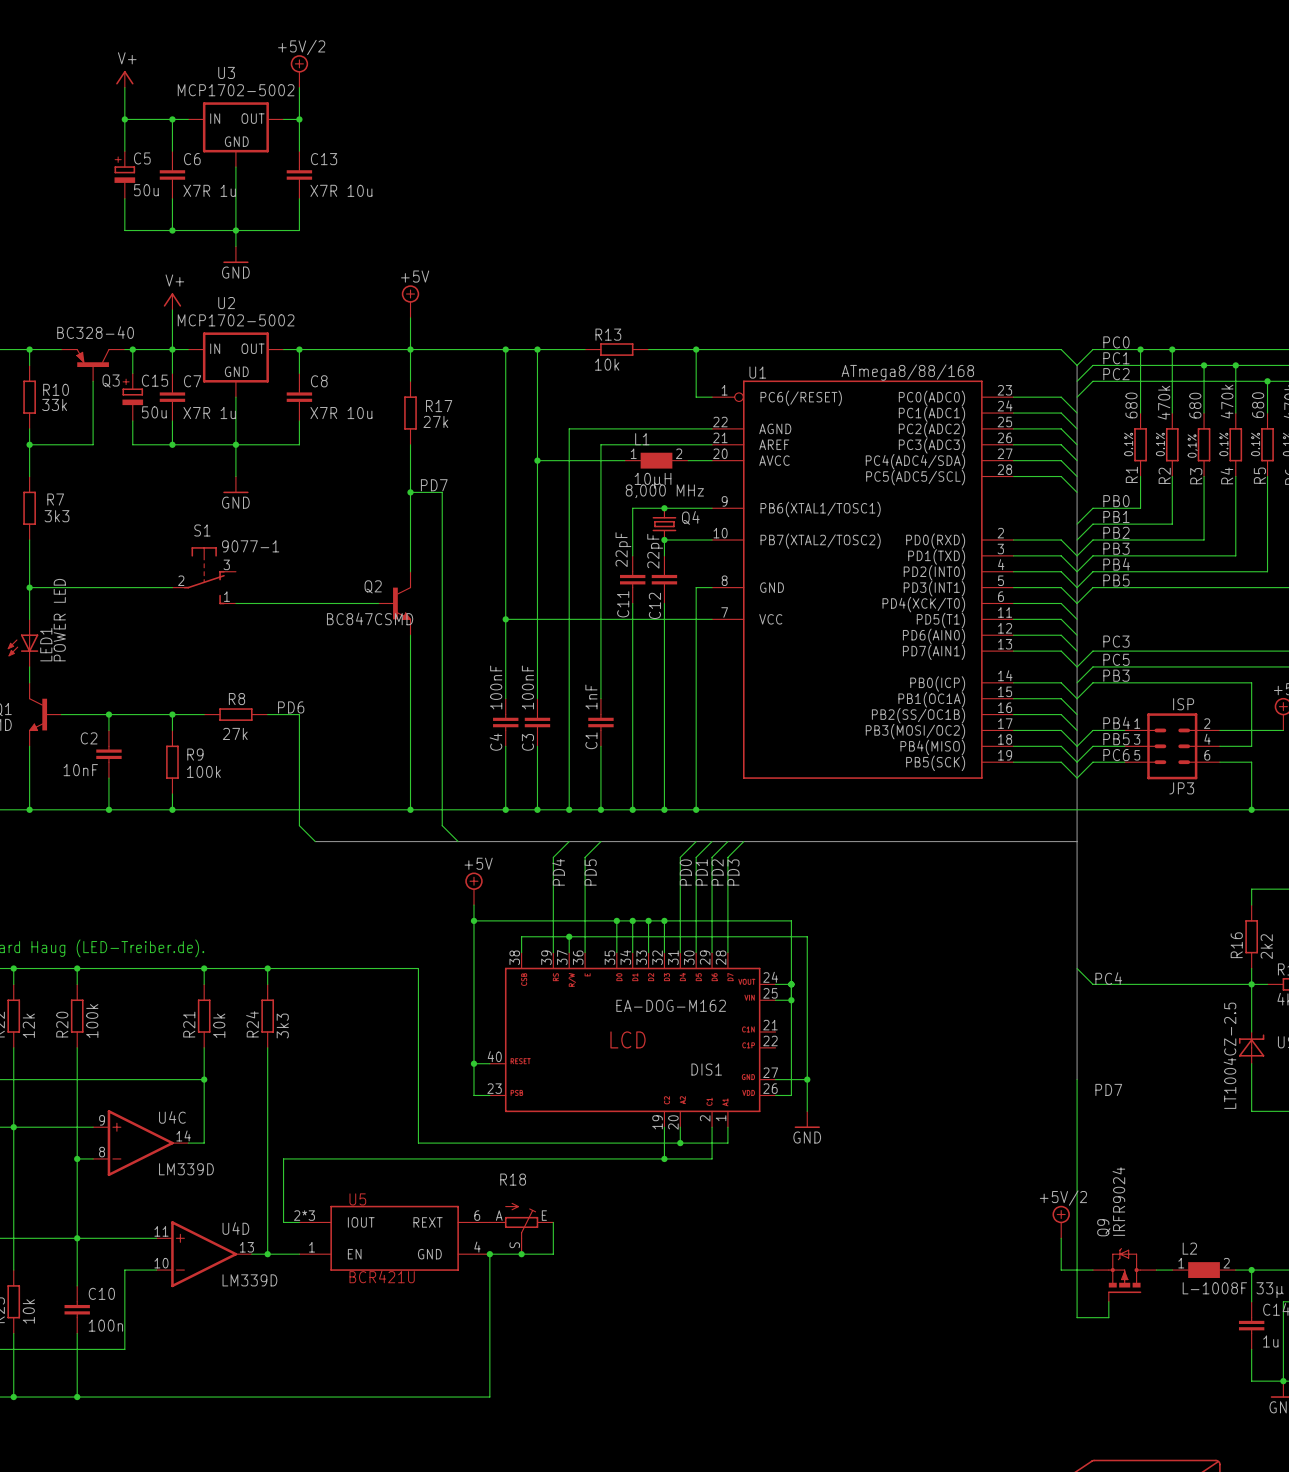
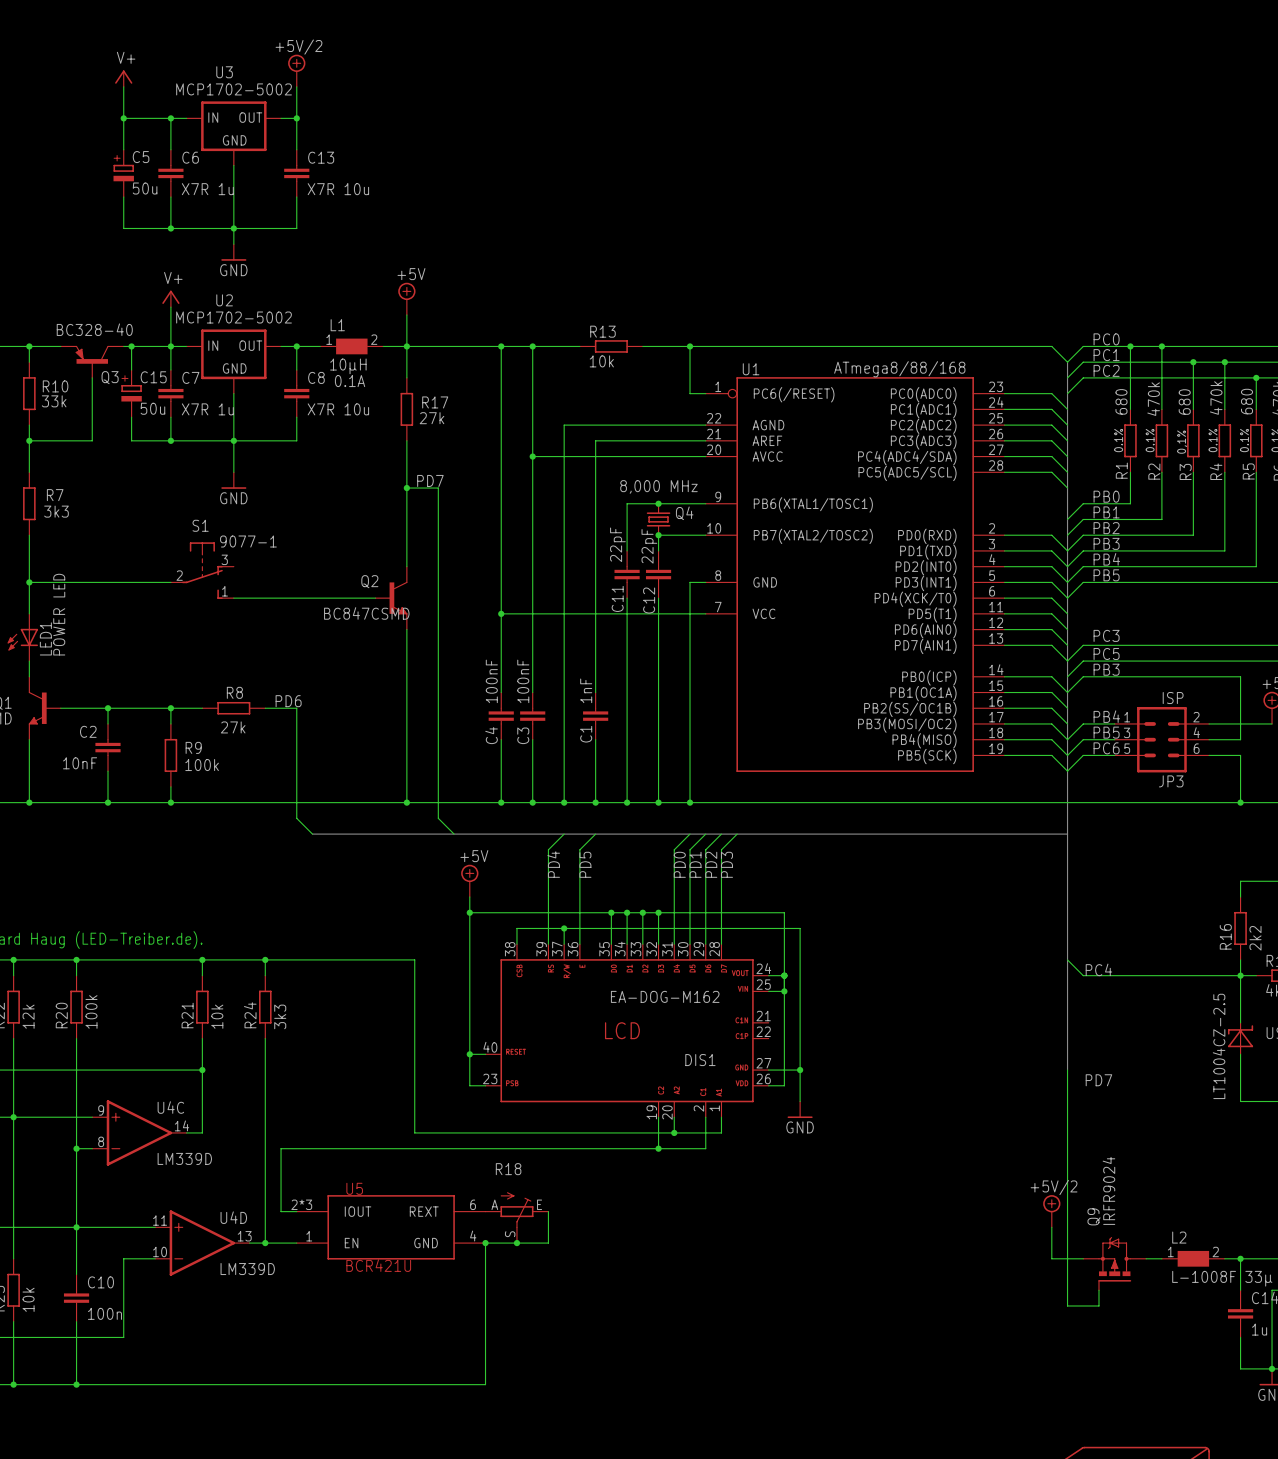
L1 text: none -> 0.1A (350, 381)
L1 position: (656, 460) -> (351, 346)

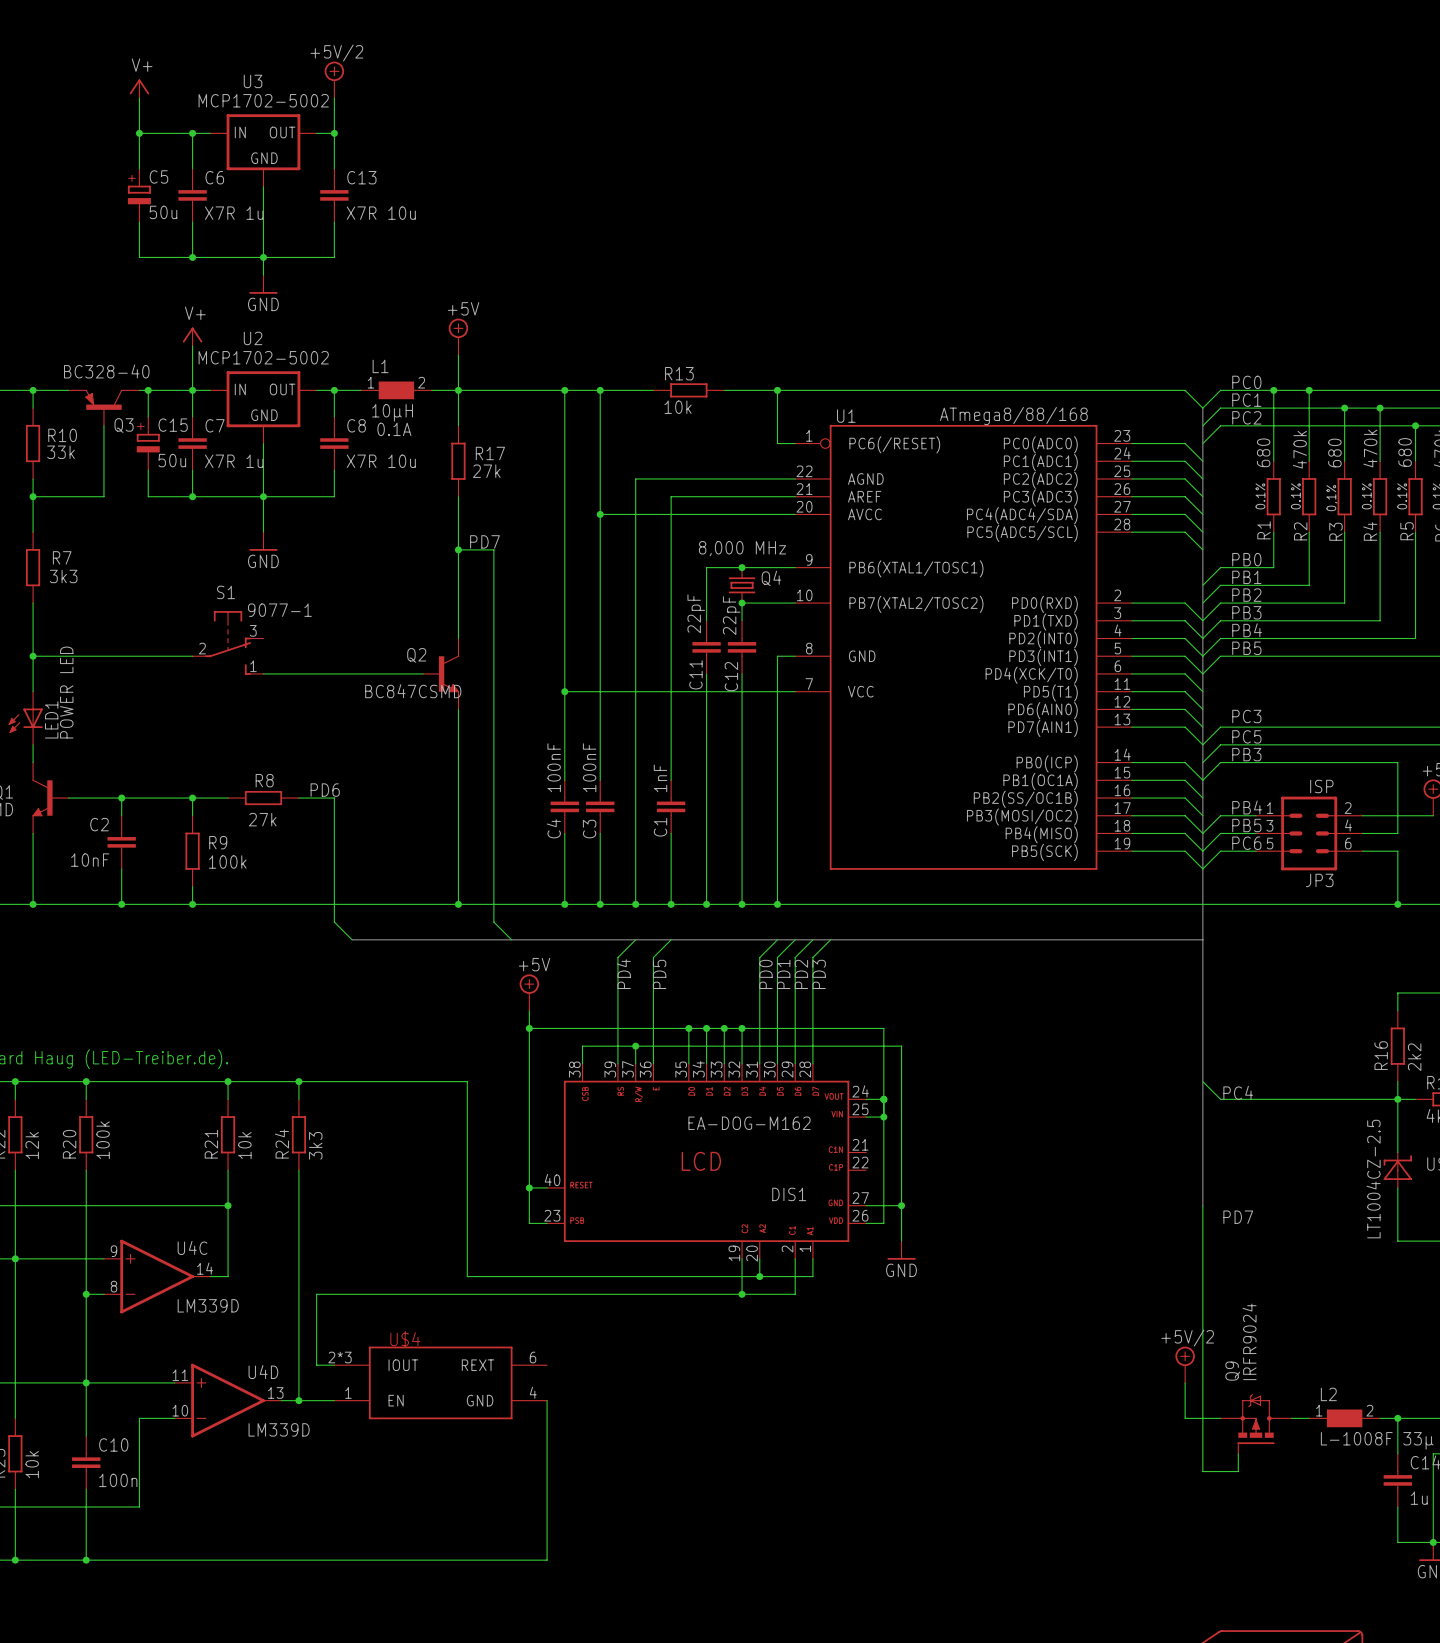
U5 name: U5 (354, 1188) -> U$4 (405, 1339)
wire: (548, 1211) (548, 1243) (485, 1243) -> none
R18: (516, 1217) -> none
junction: (485, 1243) -> none
junction: (516, 1243) -> none
U5 value: BCR421U (378, 1265) -> none

